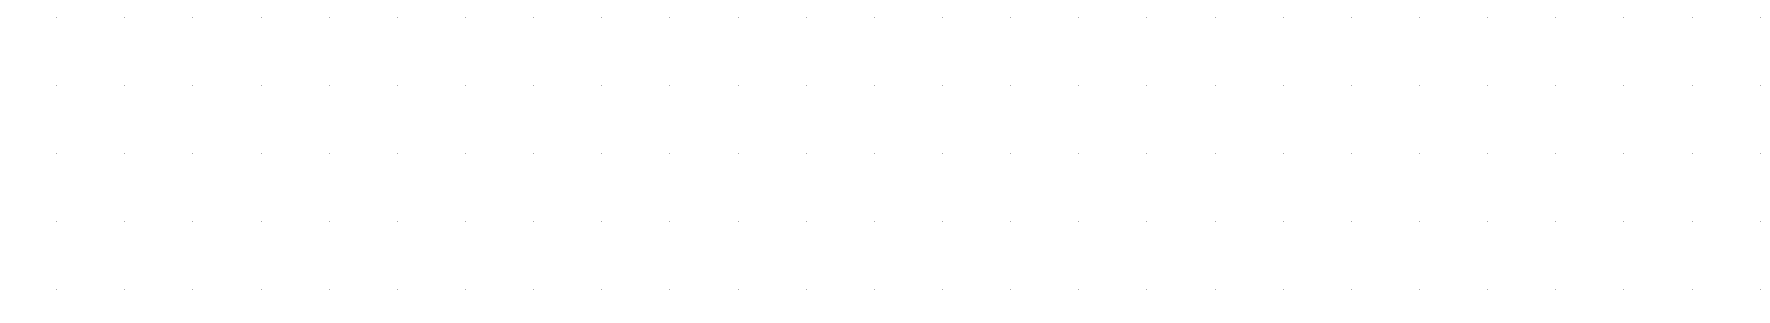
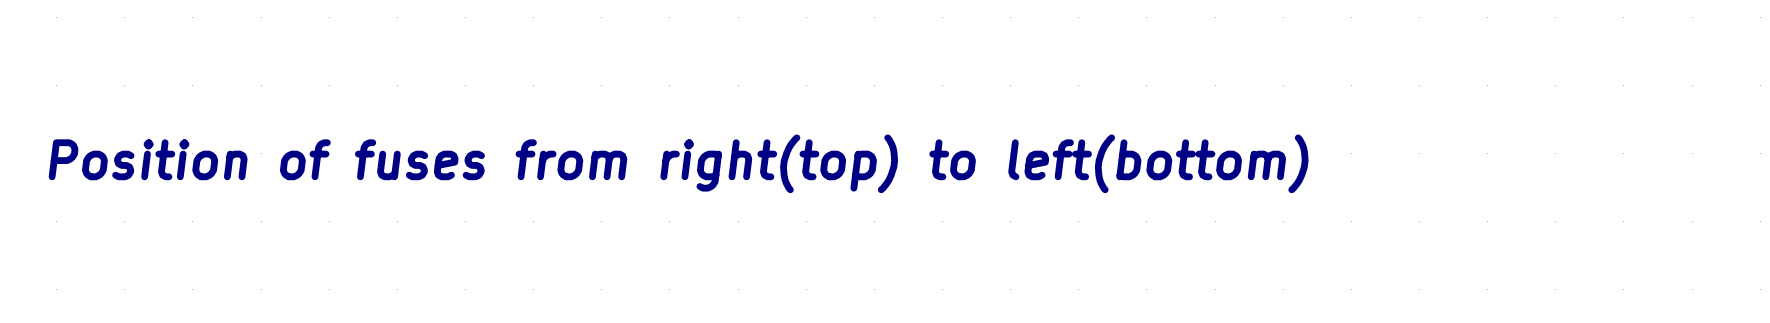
text: none -> Position of fuses from right(top) to left(bottom) (678, 163)

